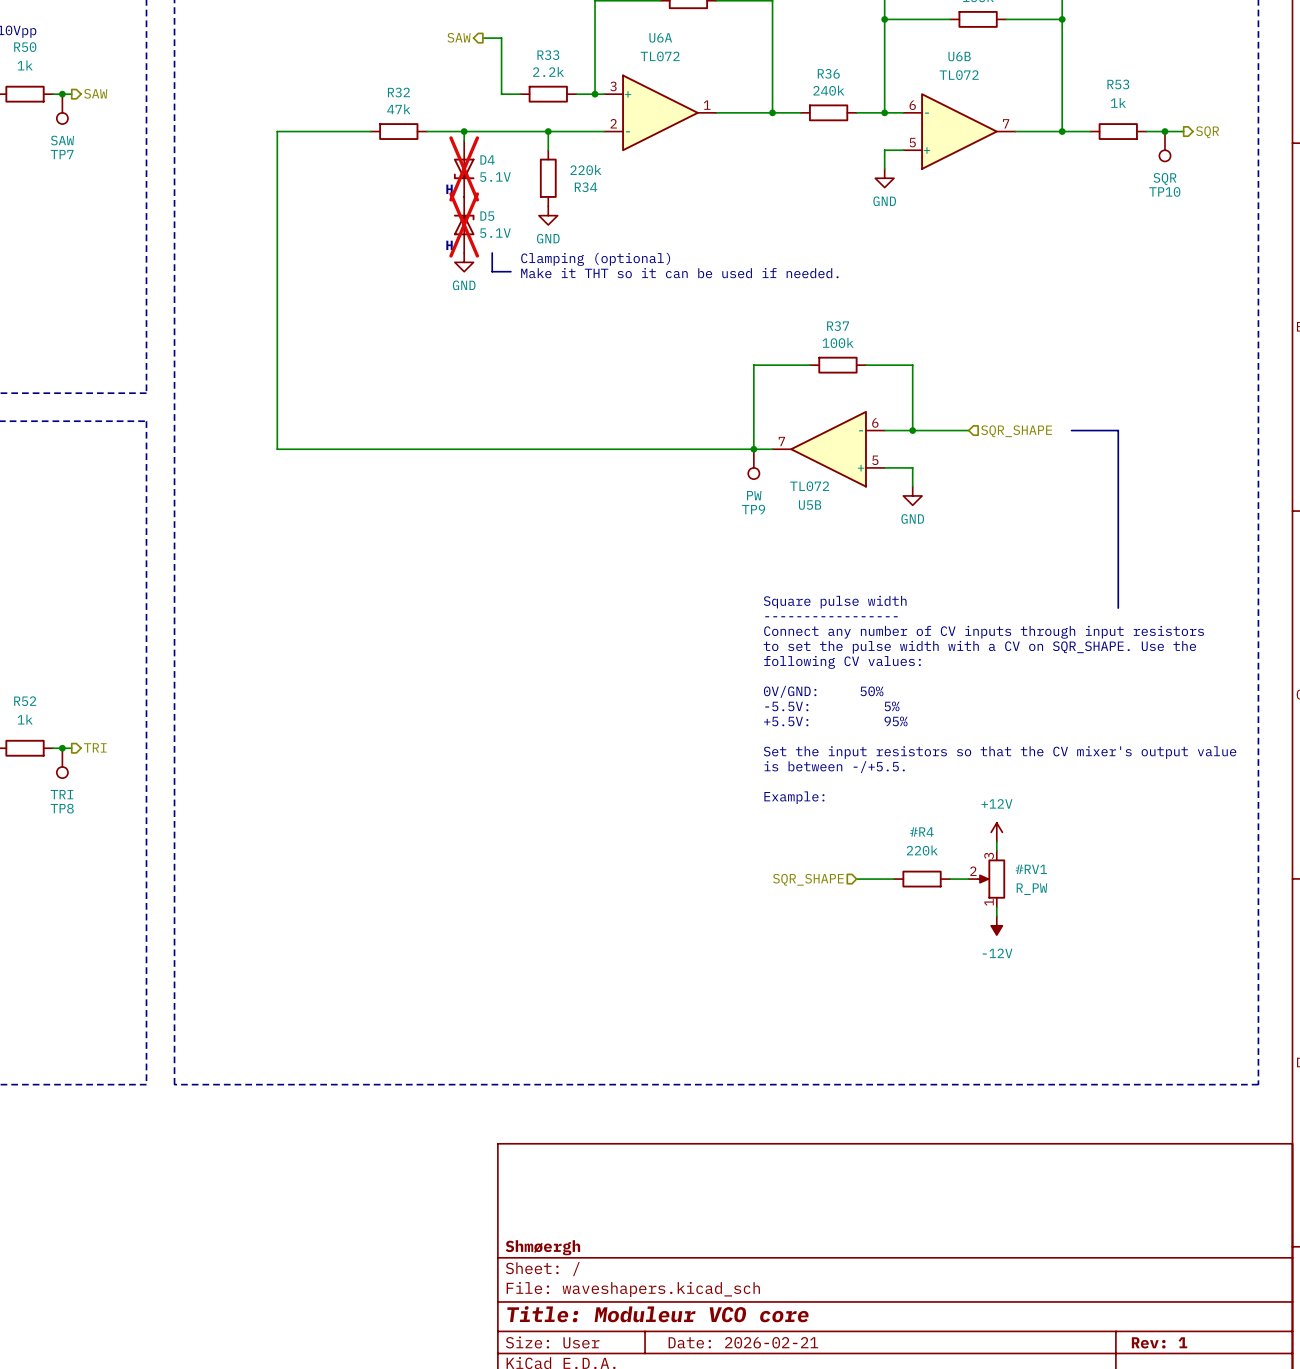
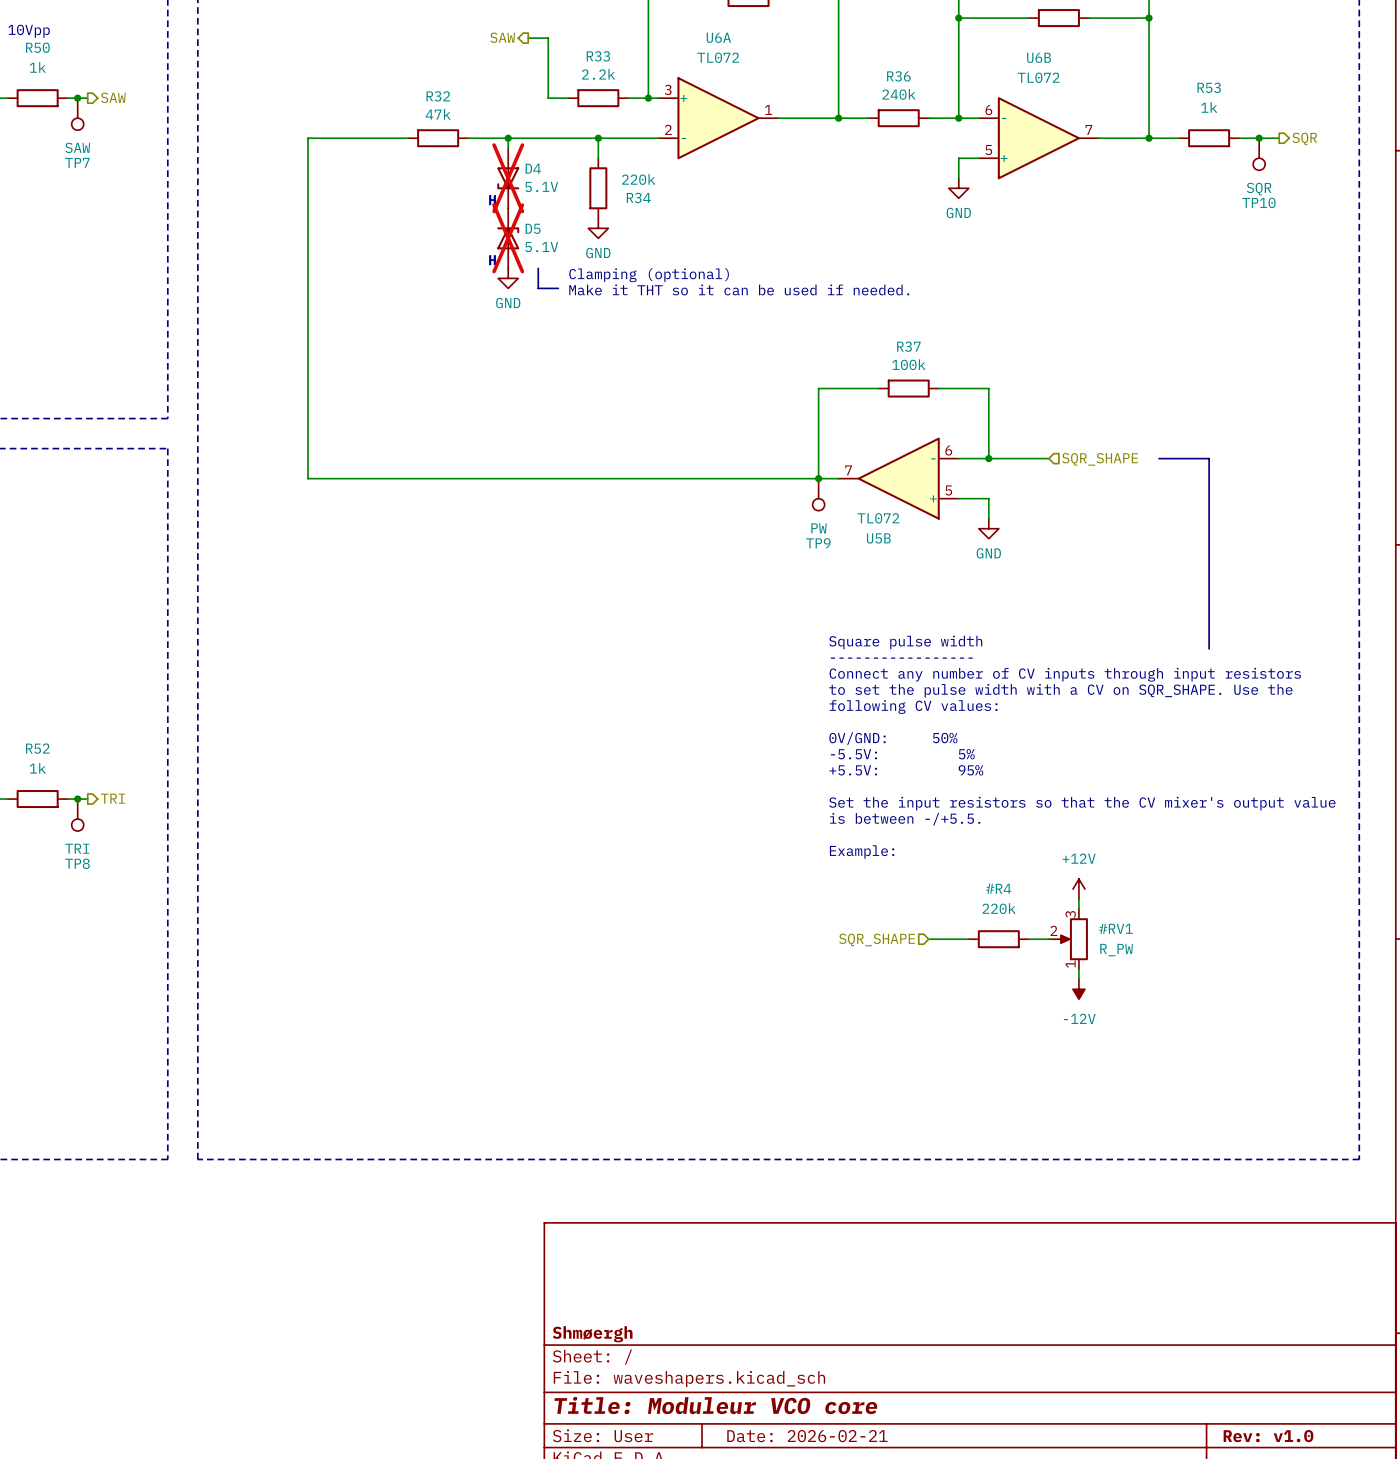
title block: Rev: 1 (1159, 1342) -> Rev: v1.0 (1268, 1436)

